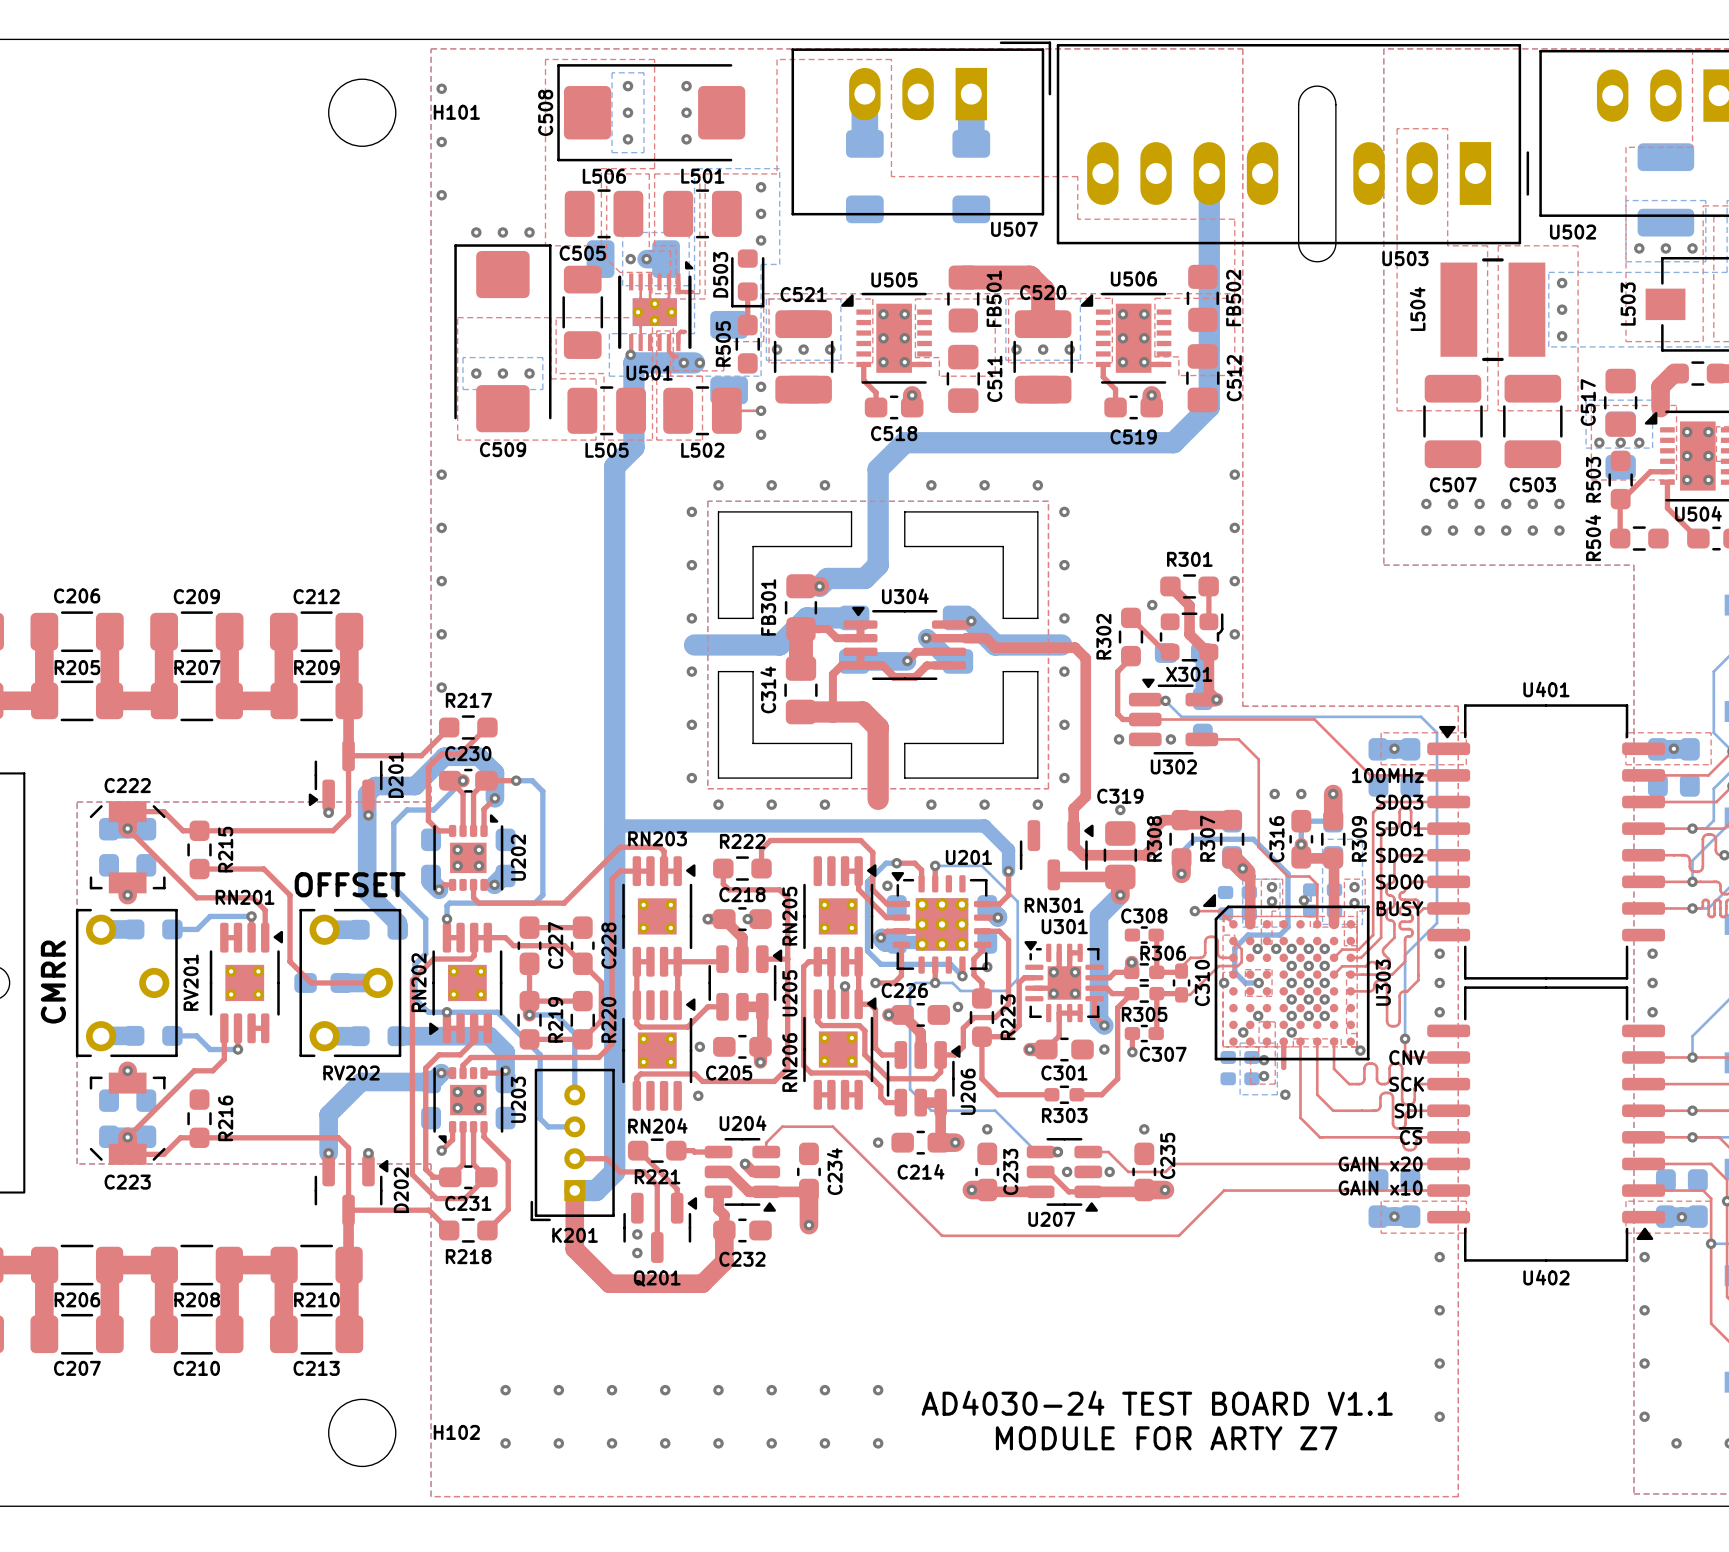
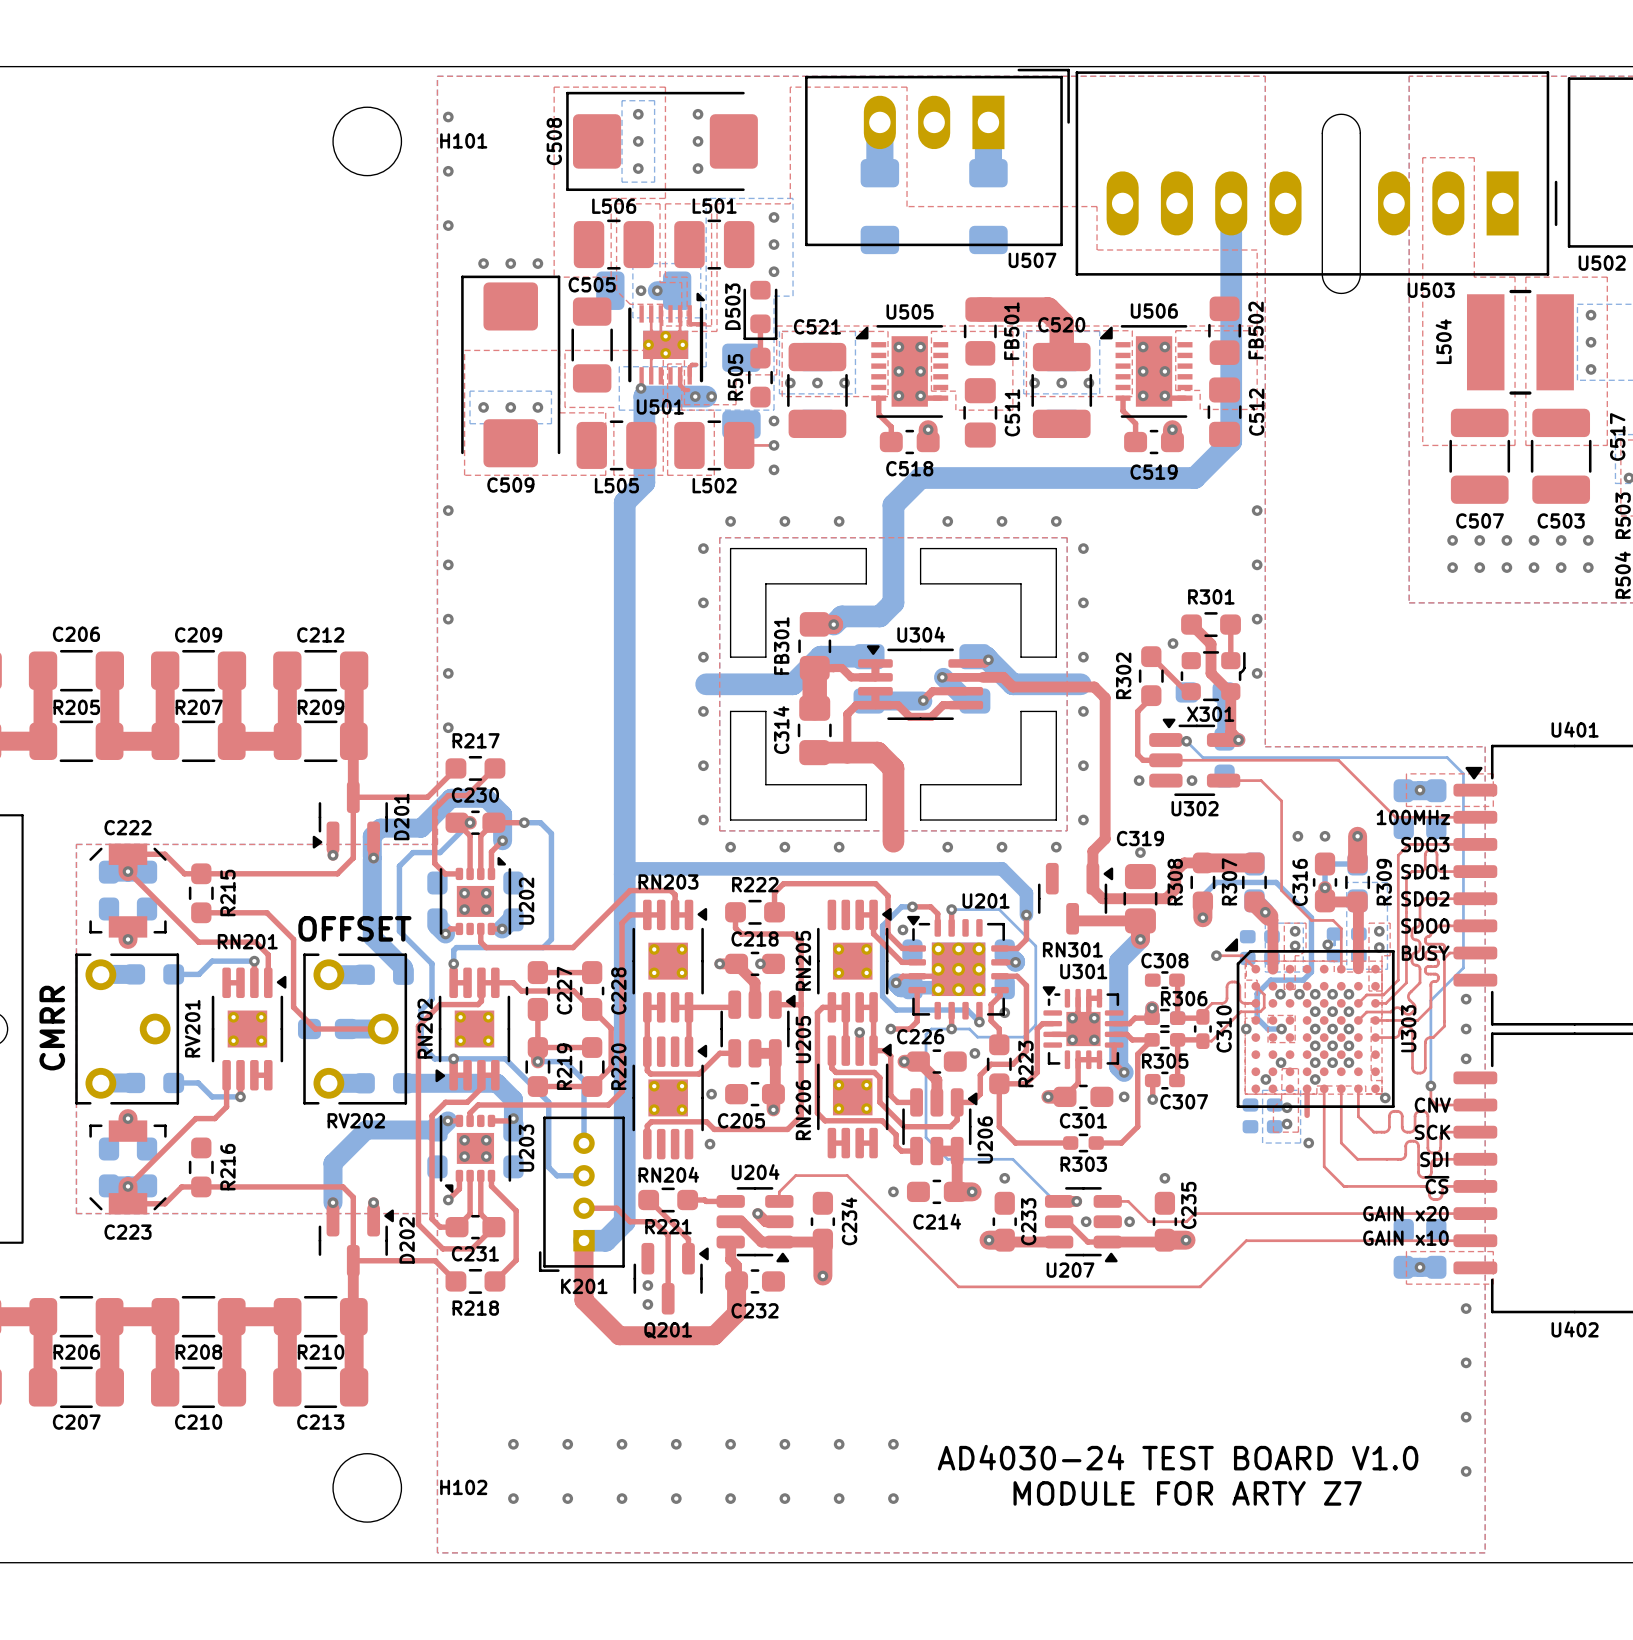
text: AD4030-24 TEST BOARD V1.1 (1157, 1403) -> AD4030-24 TEST BOARD V1.0 (1178, 1457)

